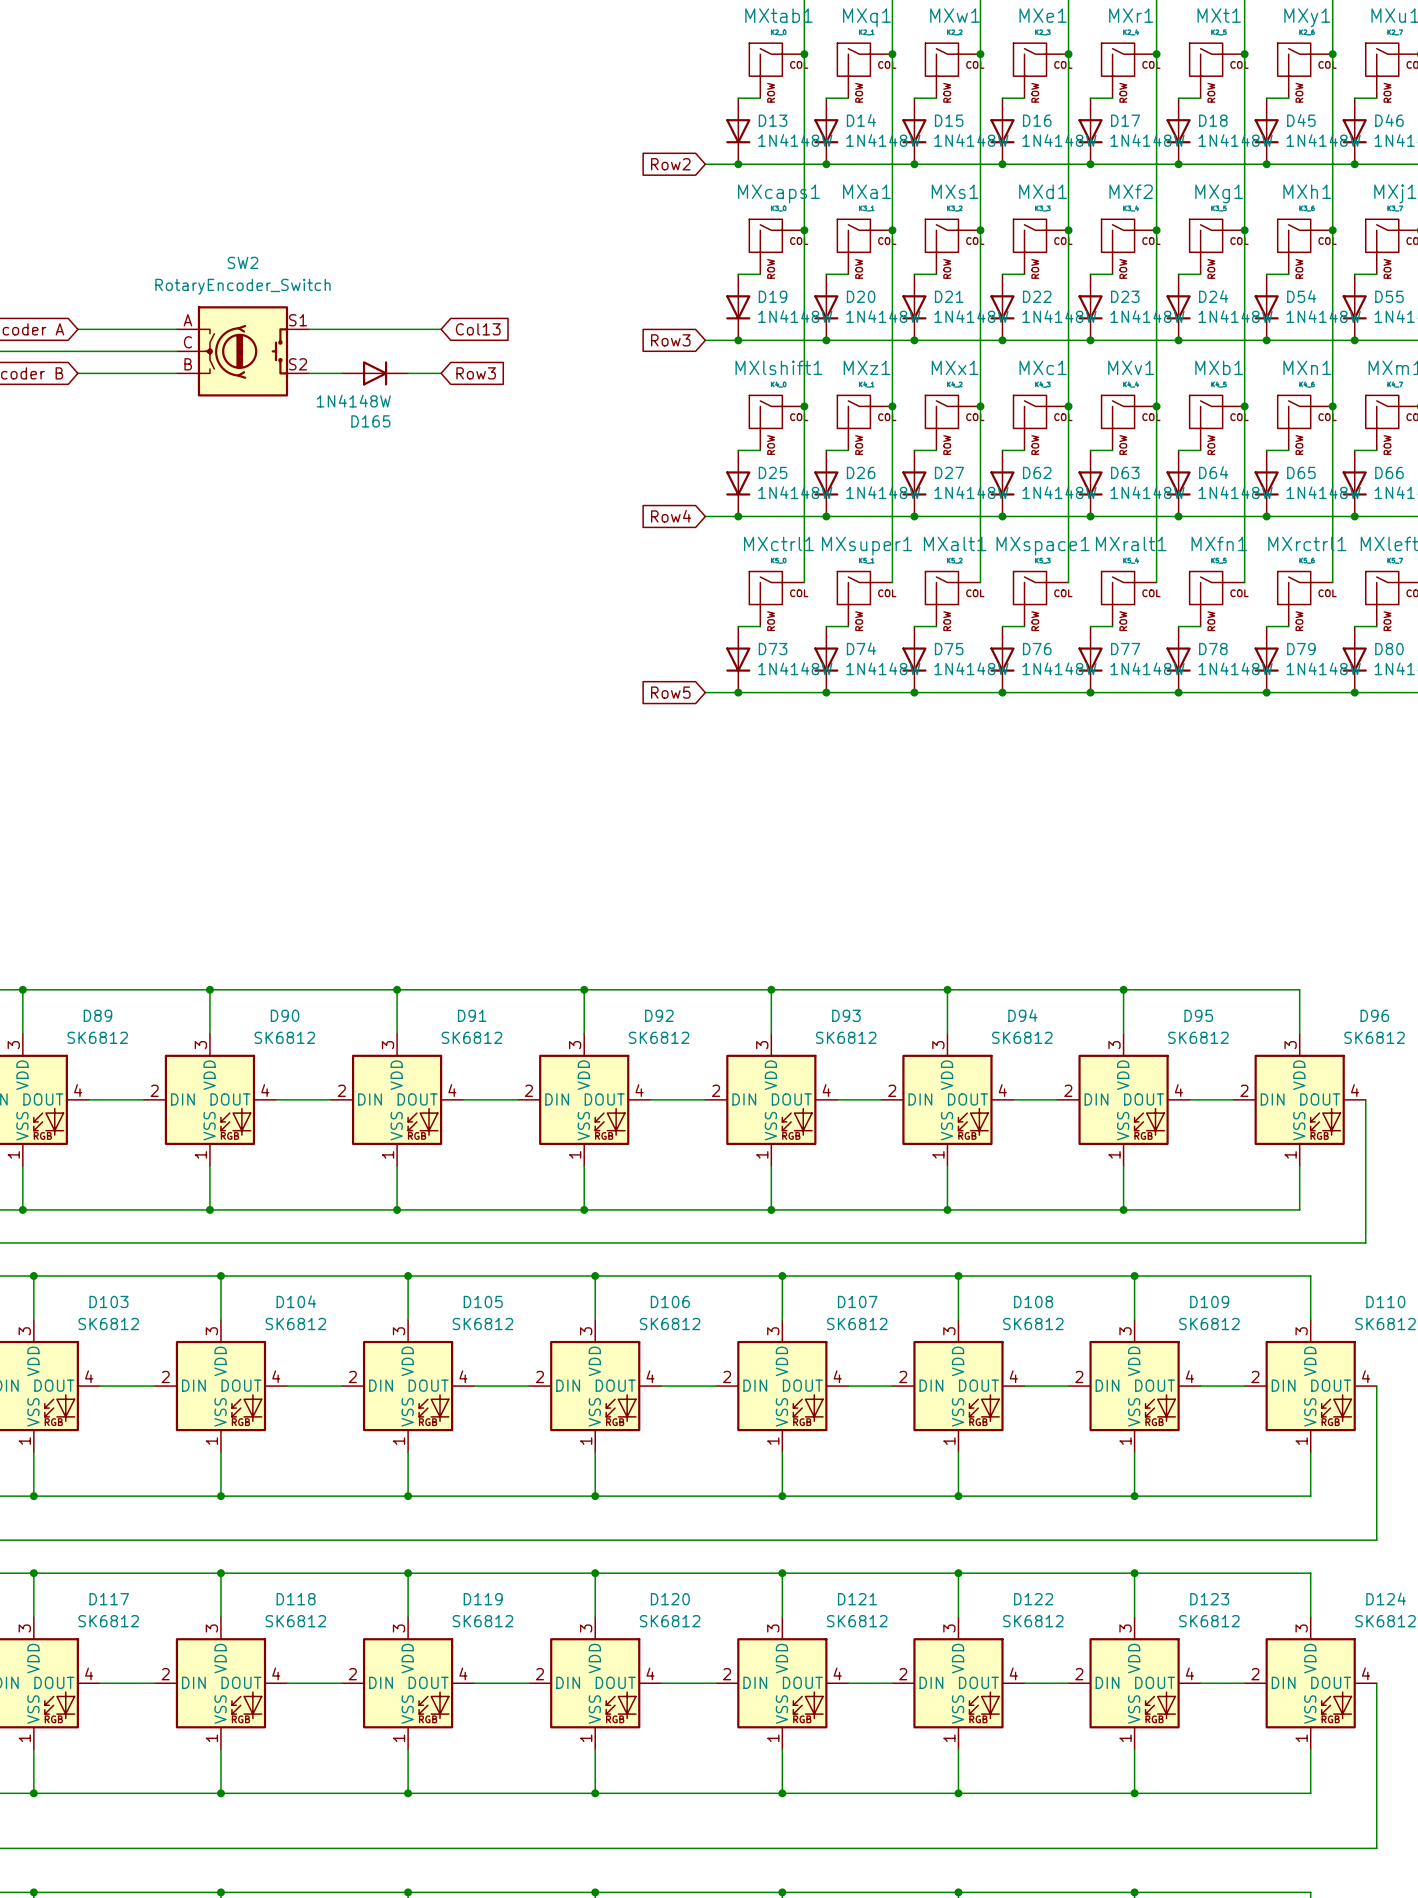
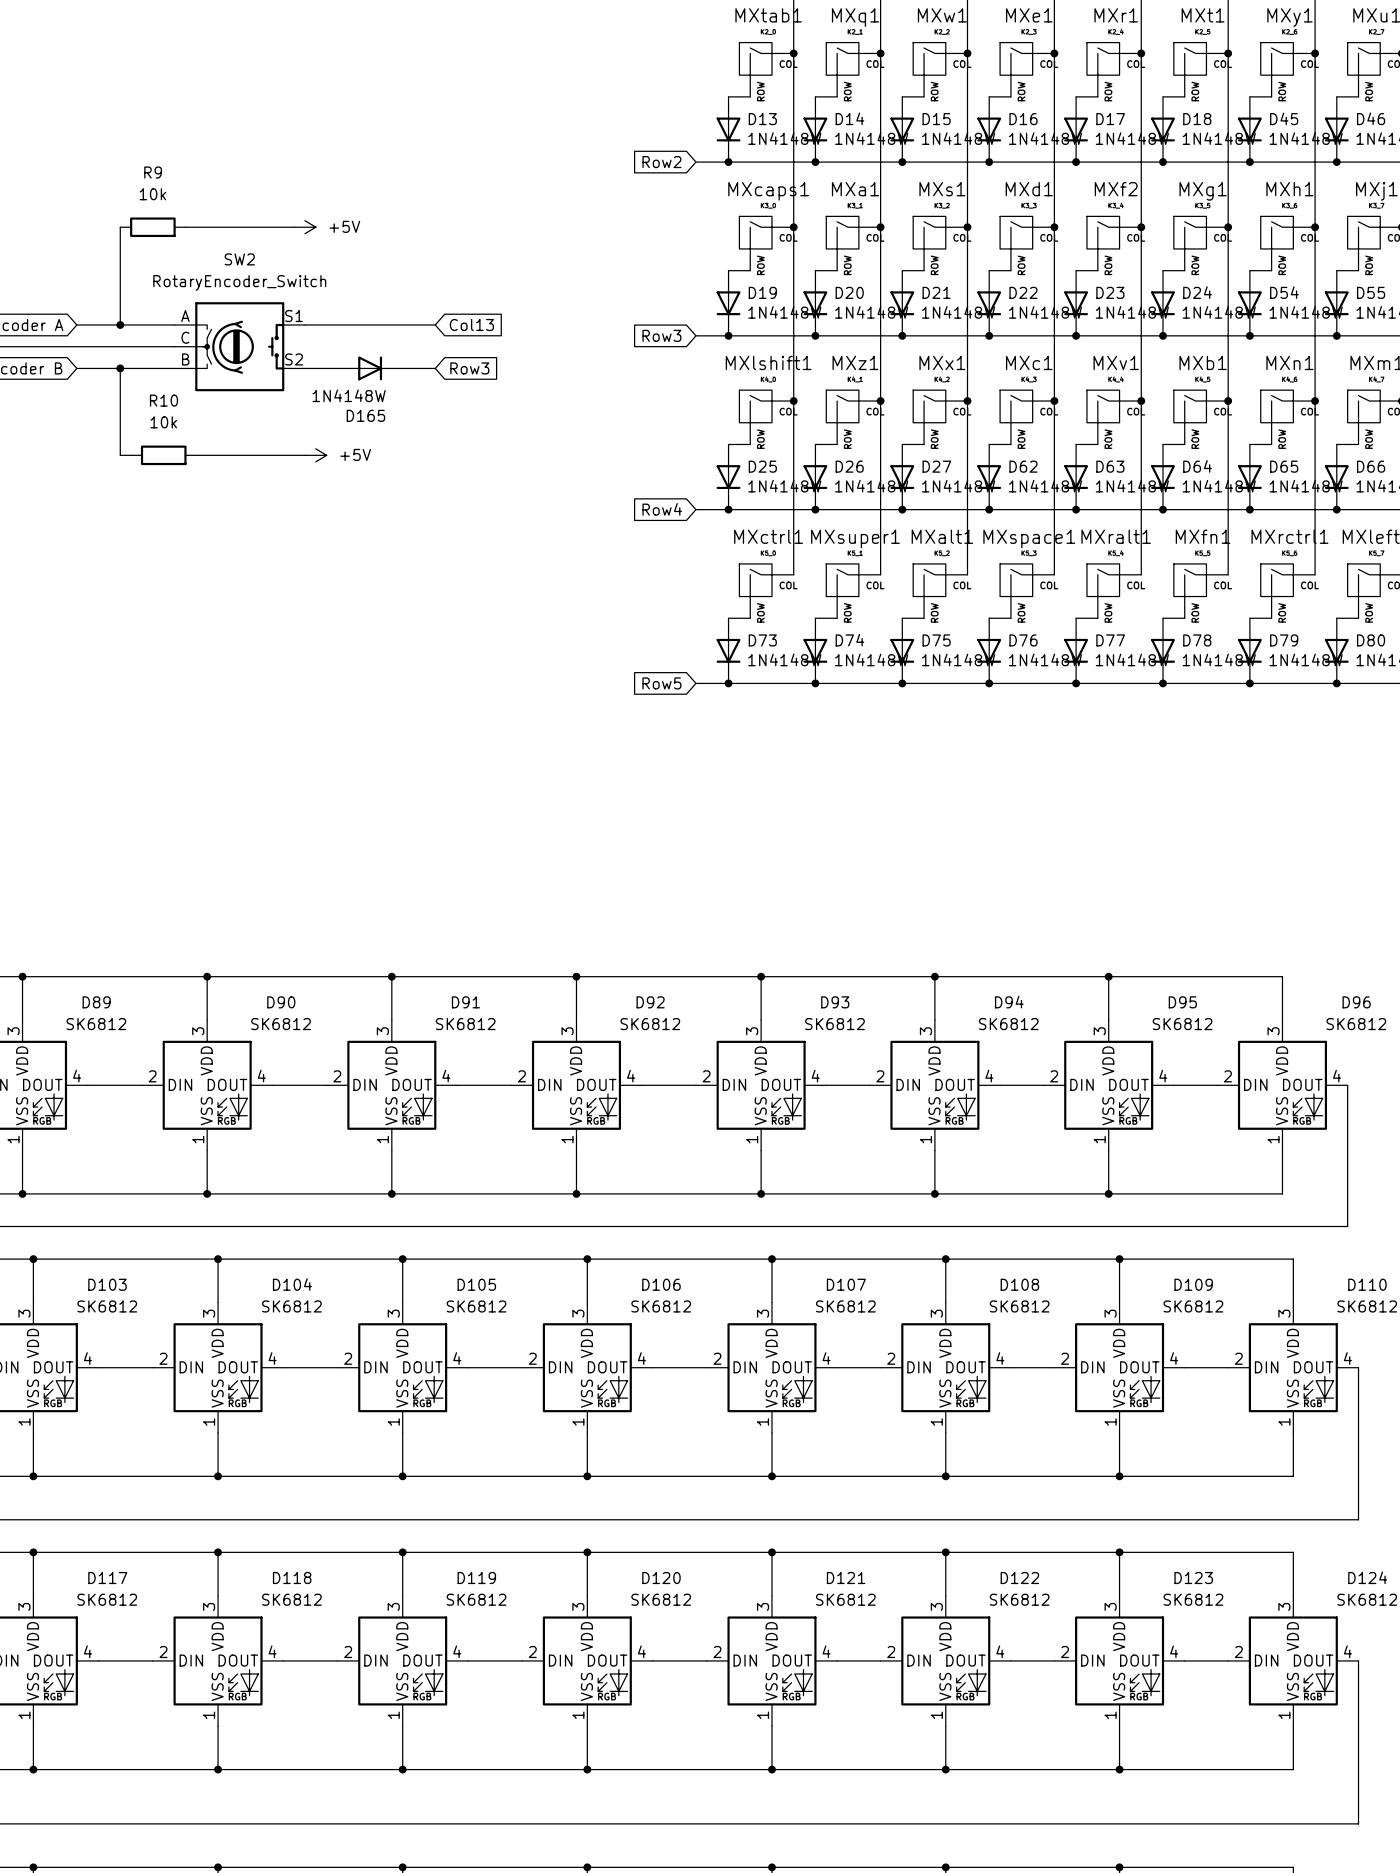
wire: none -> (120, 227) (120, 324)
R9: none -> 10k (152, 227)
wire: none -> (185, 227) (294, 227)
power symbol: none -> +5V (304, 227)
junction: none -> (120, 324)
wire: none -> (120, 368) (120, 455) (131, 455)
junction: none -> (120, 368)
R10: none -> 10k (163, 455)
wire: none -> (196, 455) (304, 455)
power symbol: none -> +5V (315, 455)

